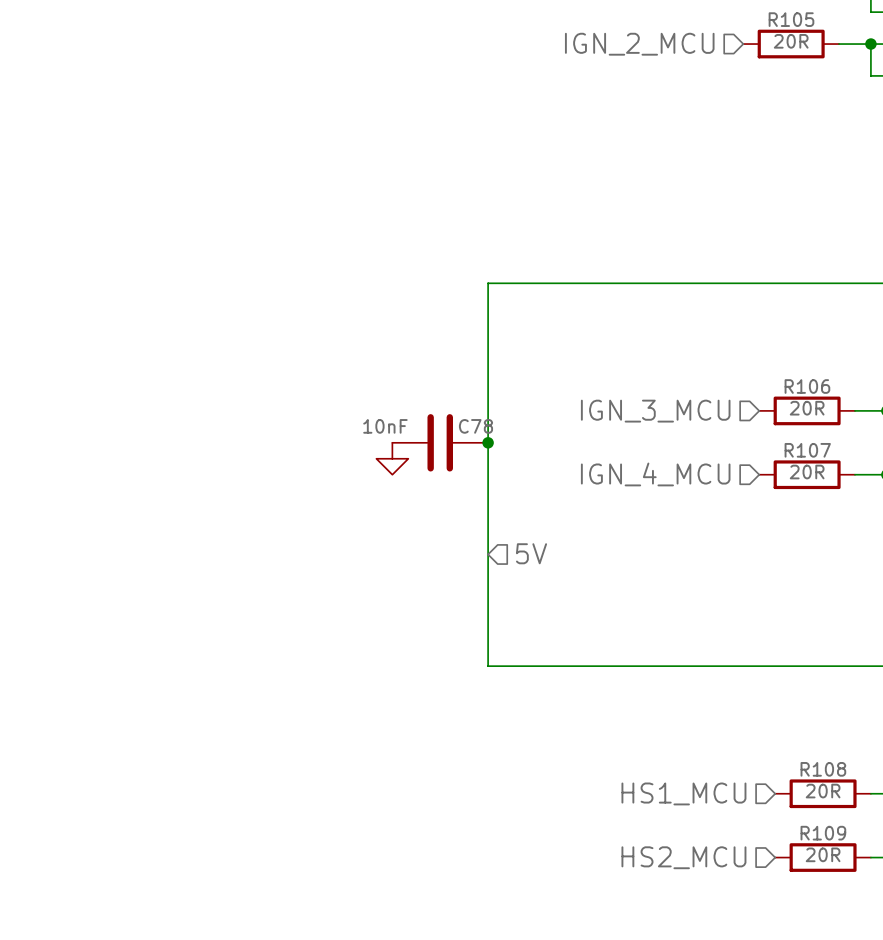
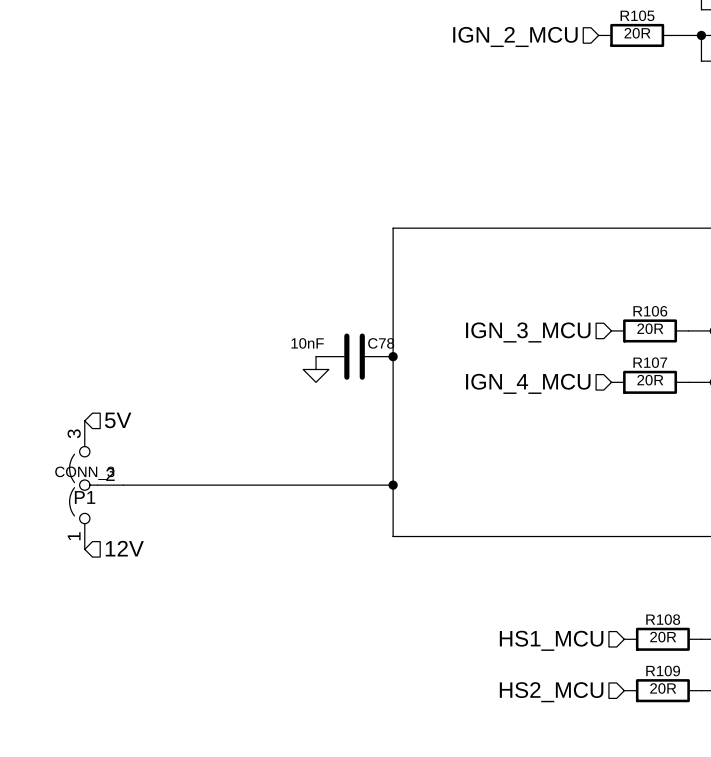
hierarchical label: none -> 5V (118, 420)
hierarchical label: 5V (531, 553) -> none
P1: none -> CONN_3 (96, 485)
wire: none -> (123, 485) (393, 485)
junction: none -> (393, 485)
hierarchical label: none -> 12V (124, 548)

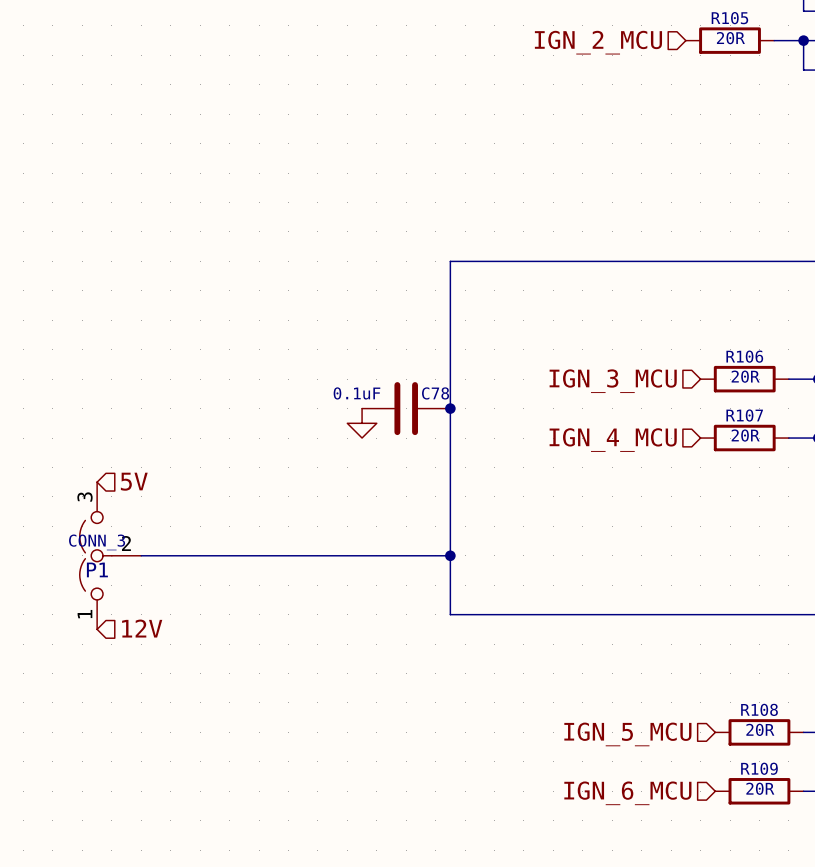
C78 value: 10nF (307, 343) -> 0.1uF (356, 393)
hierarchical label: HS1_MCU (551, 640) -> IGN_5_MCU (627, 734)
hierarchical label: HS2_MCU (551, 692) -> IGN_6_MCU (627, 793)

